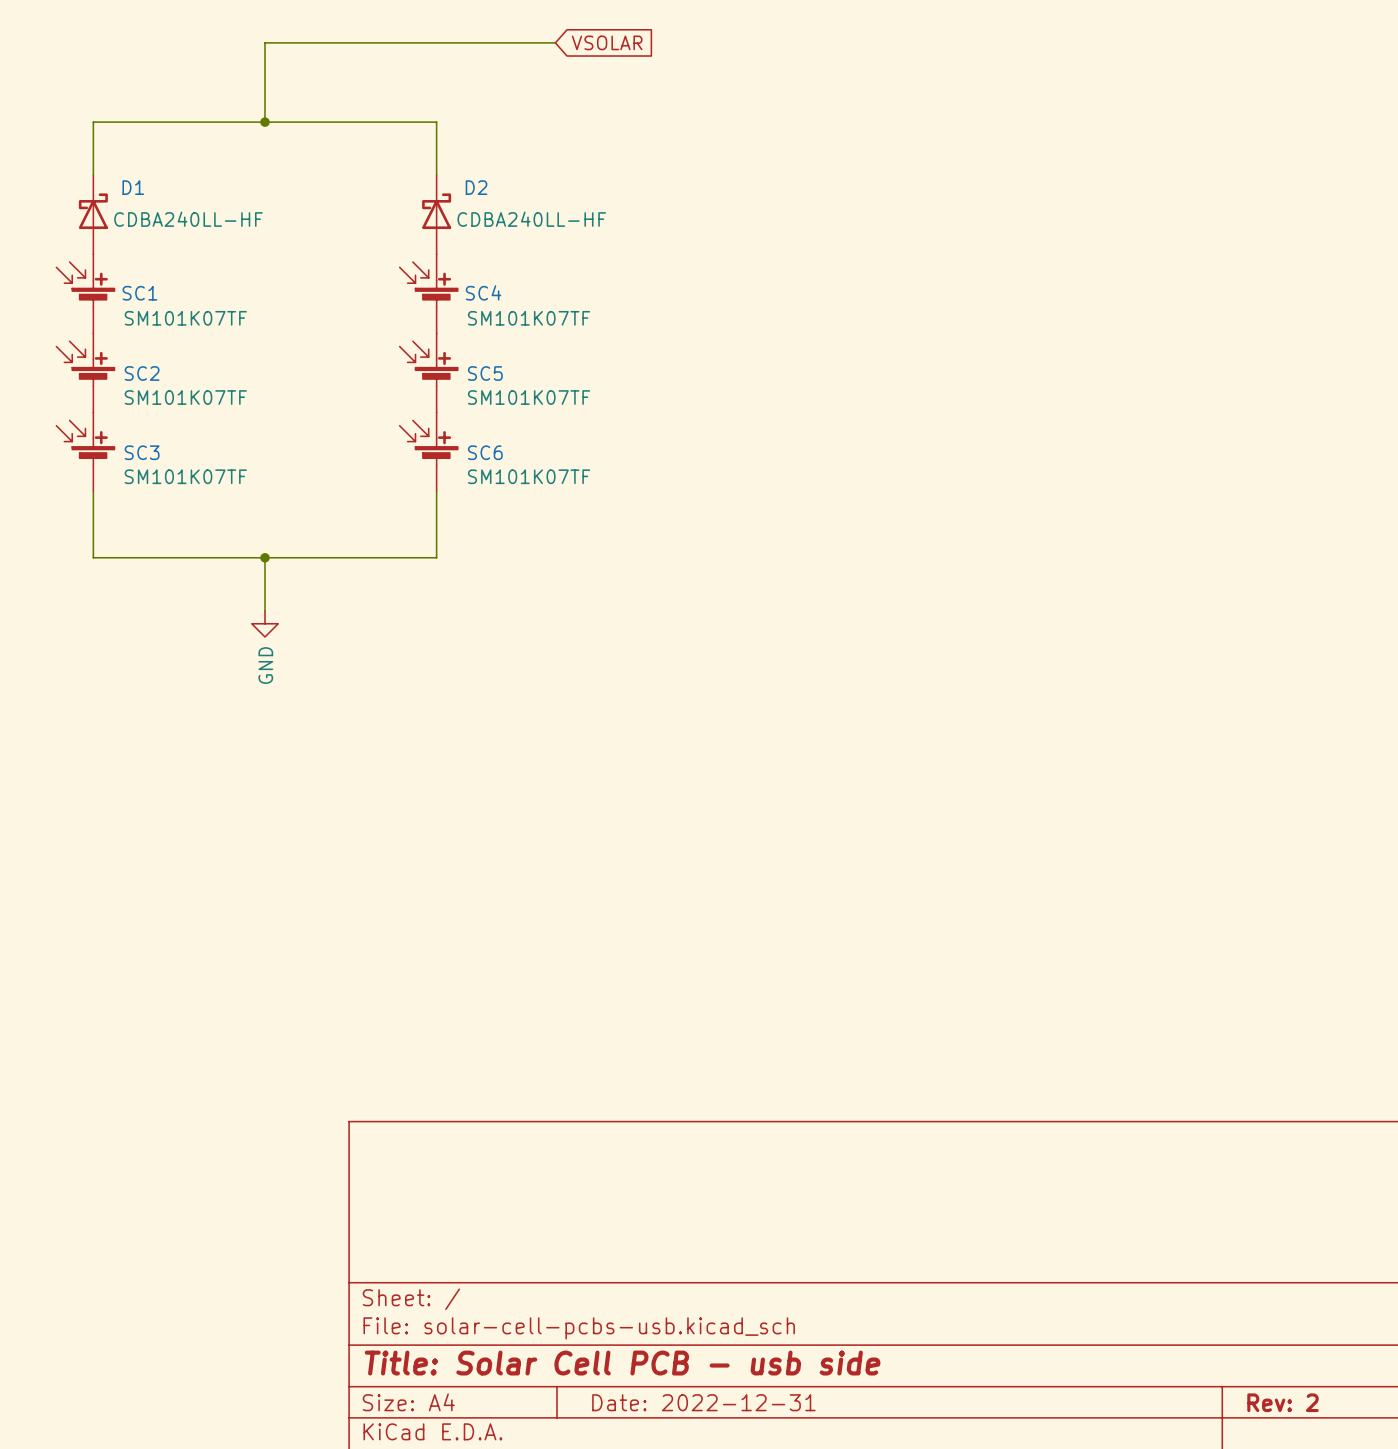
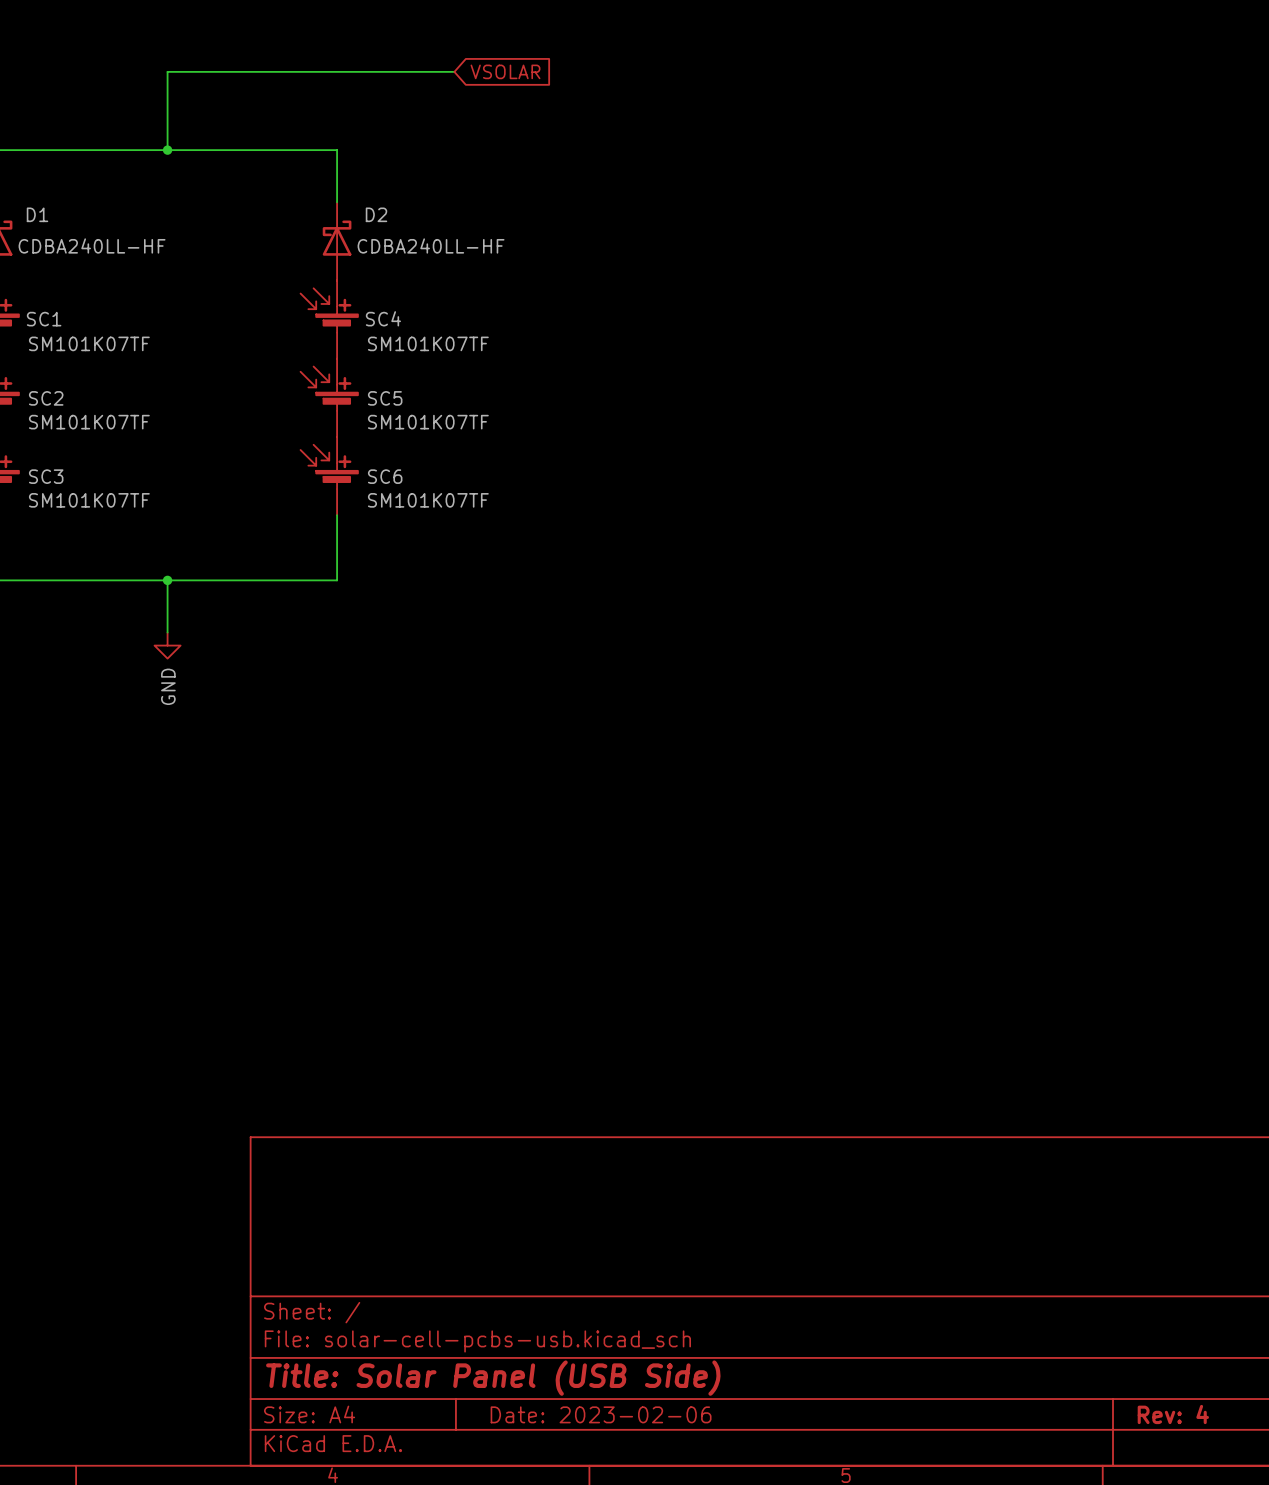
title block: Title: Solar Cell PCB - usb side (622, 1363) -> Title: Solar Panel (USB Side) (493, 1378)
title block: Date: 2022-12-31 (703, 1402) -> Date: 2023-02-06 (601, 1414)
title block: Rev: 2 (1283, 1402) -> Rev: 4 (1173, 1414)

